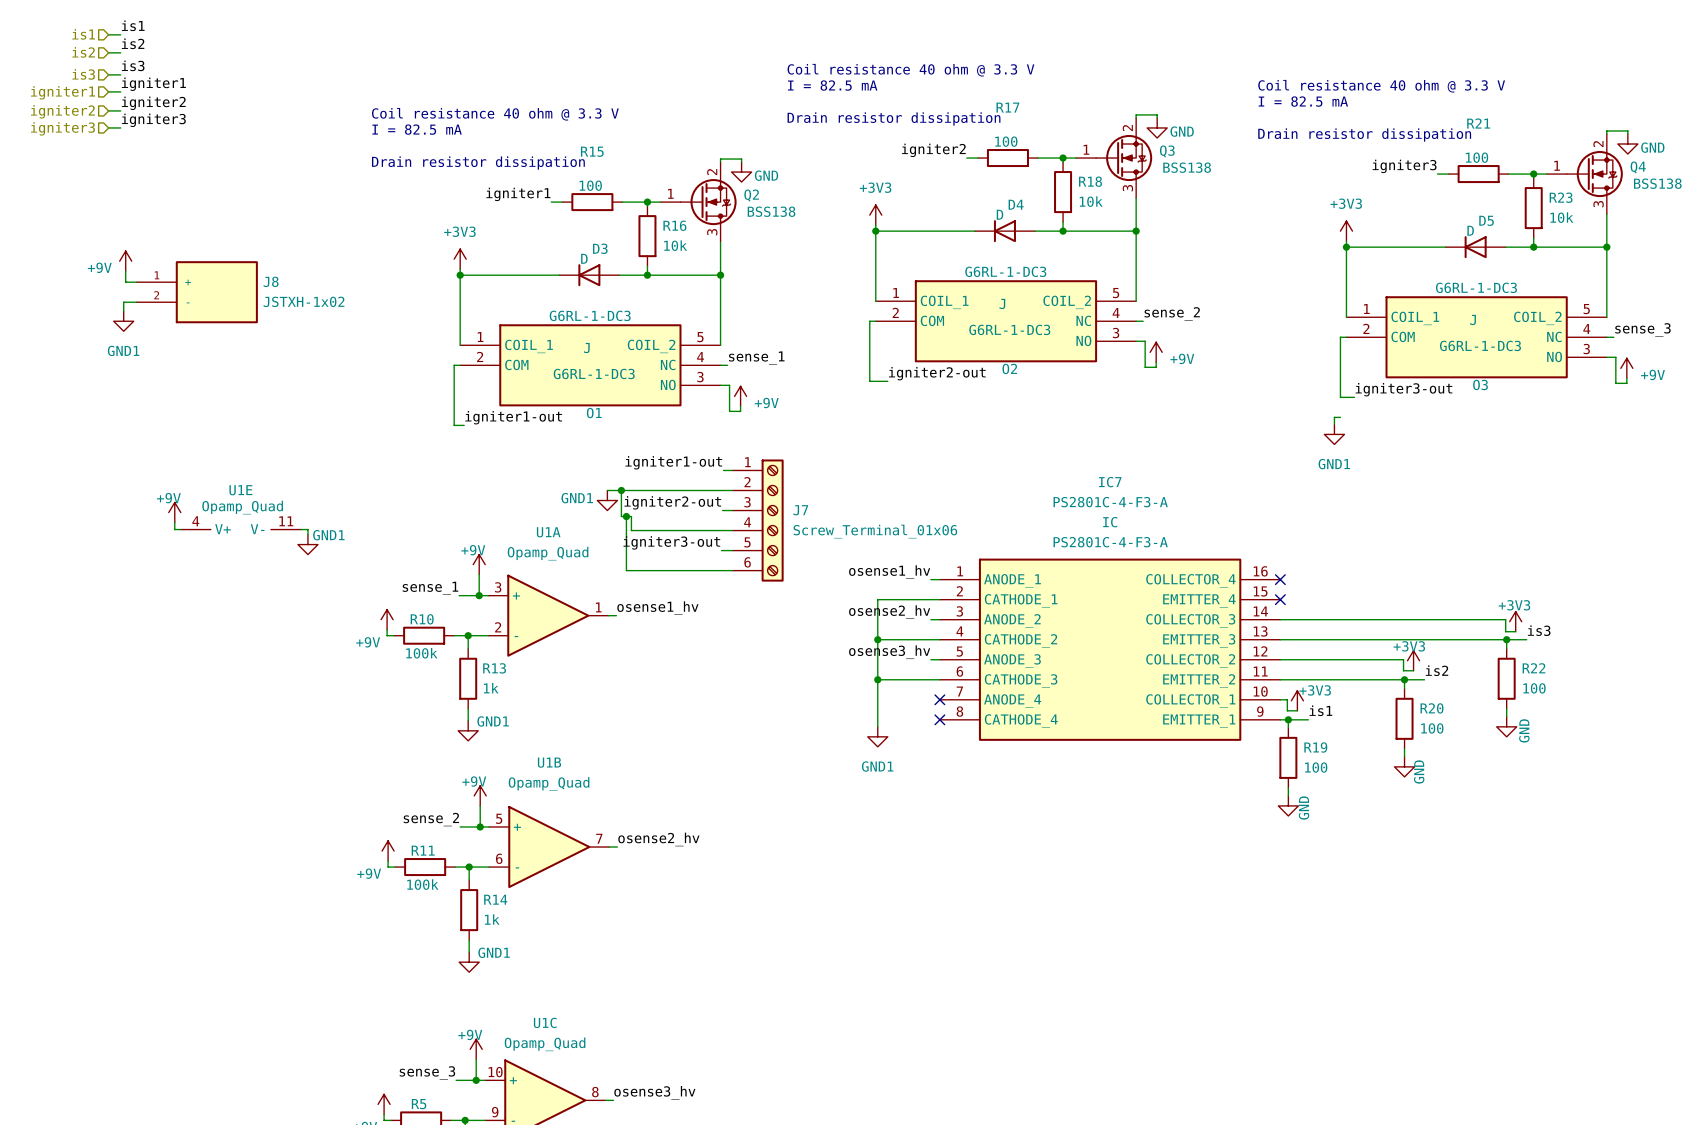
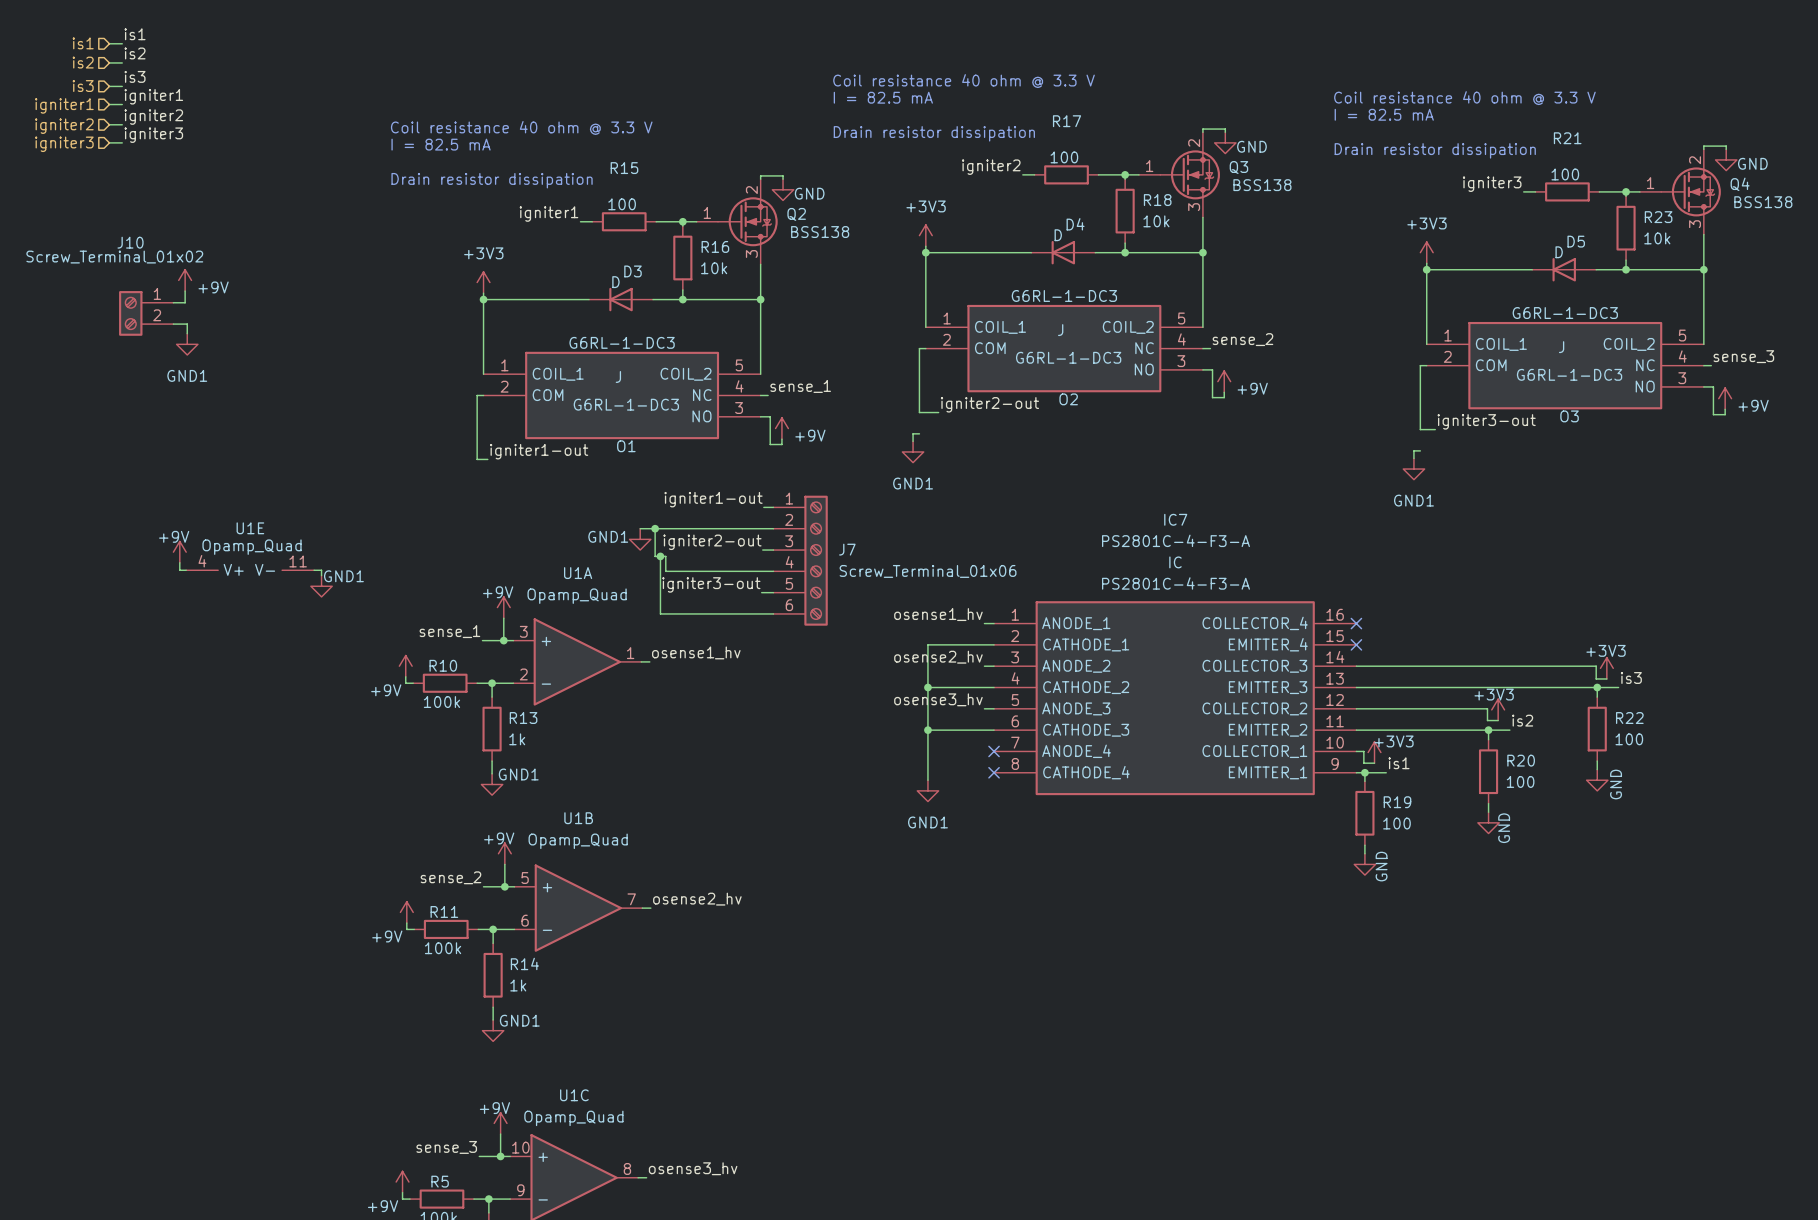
power symbol position: +9V (125, 261) -> +9V (185, 280)
power symbol text position: +9V (99, 267) -> +9V (213, 287)
J10: none -> Screw_Terminal_01x02 (146, 313)
J8: JSTXH-1x02 (197, 292) -> none
power symbol position: GND1 (123, 321) -> GND1 (187, 344)
wire: none -> (919, 433) (913, 433) (913, 441)
power symbol: none -> GND1 (913, 451)

